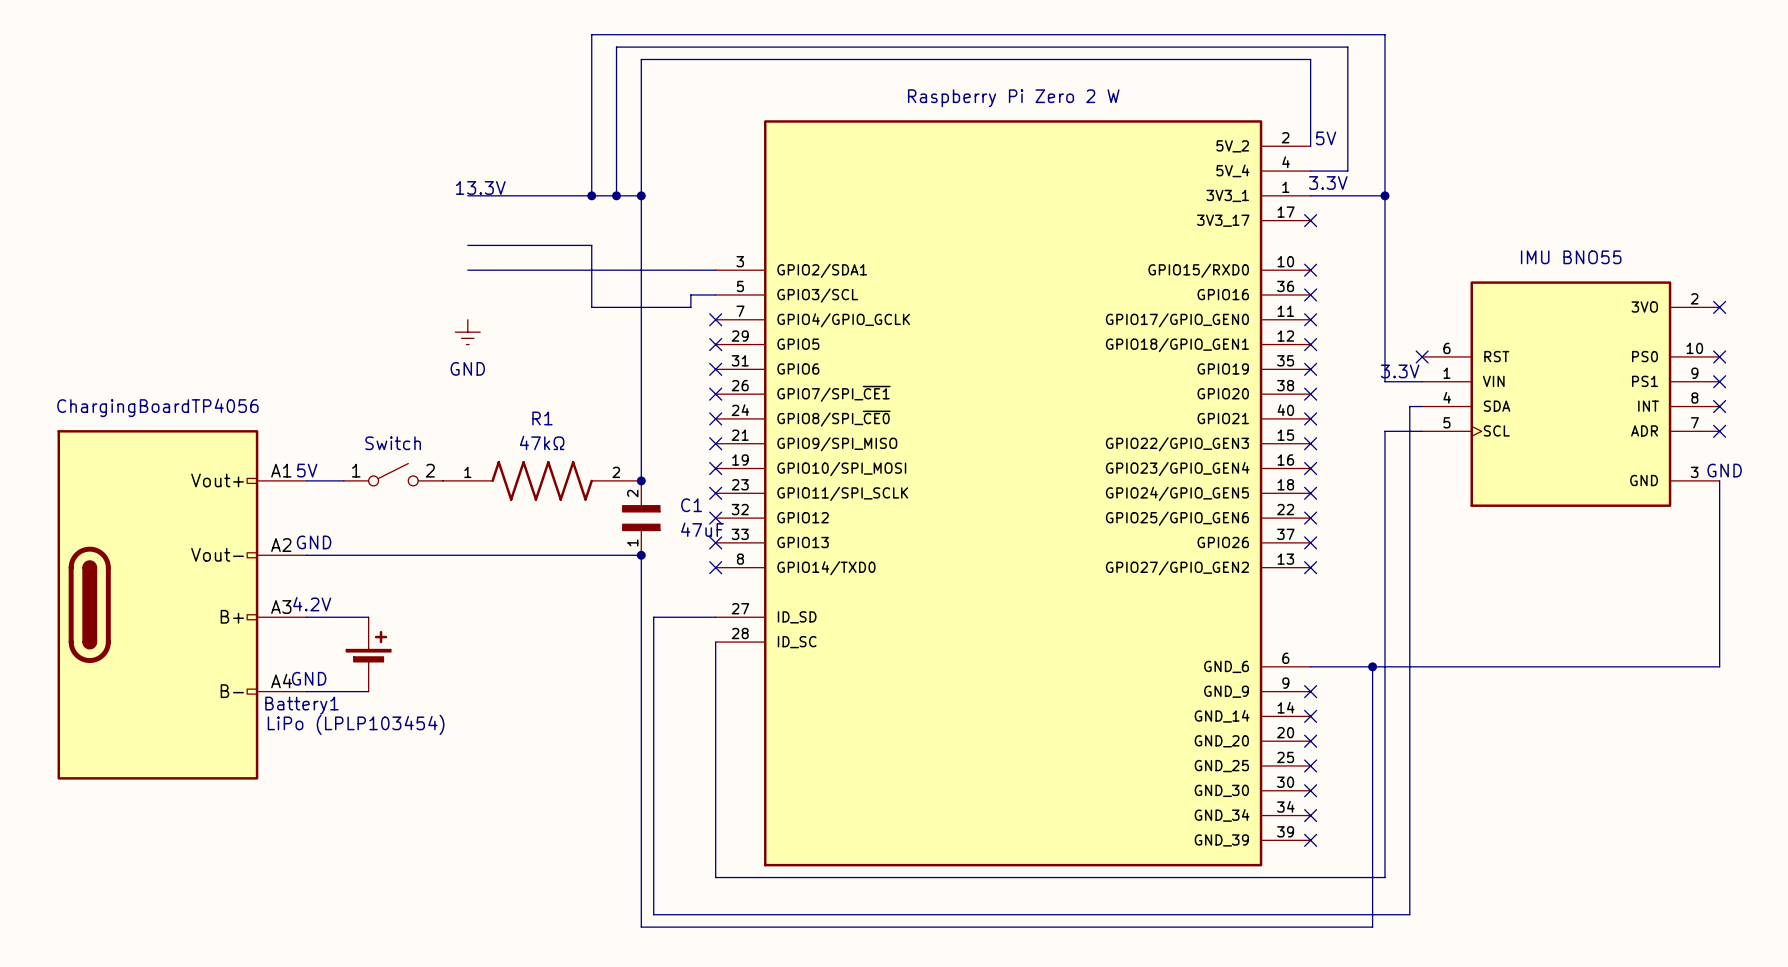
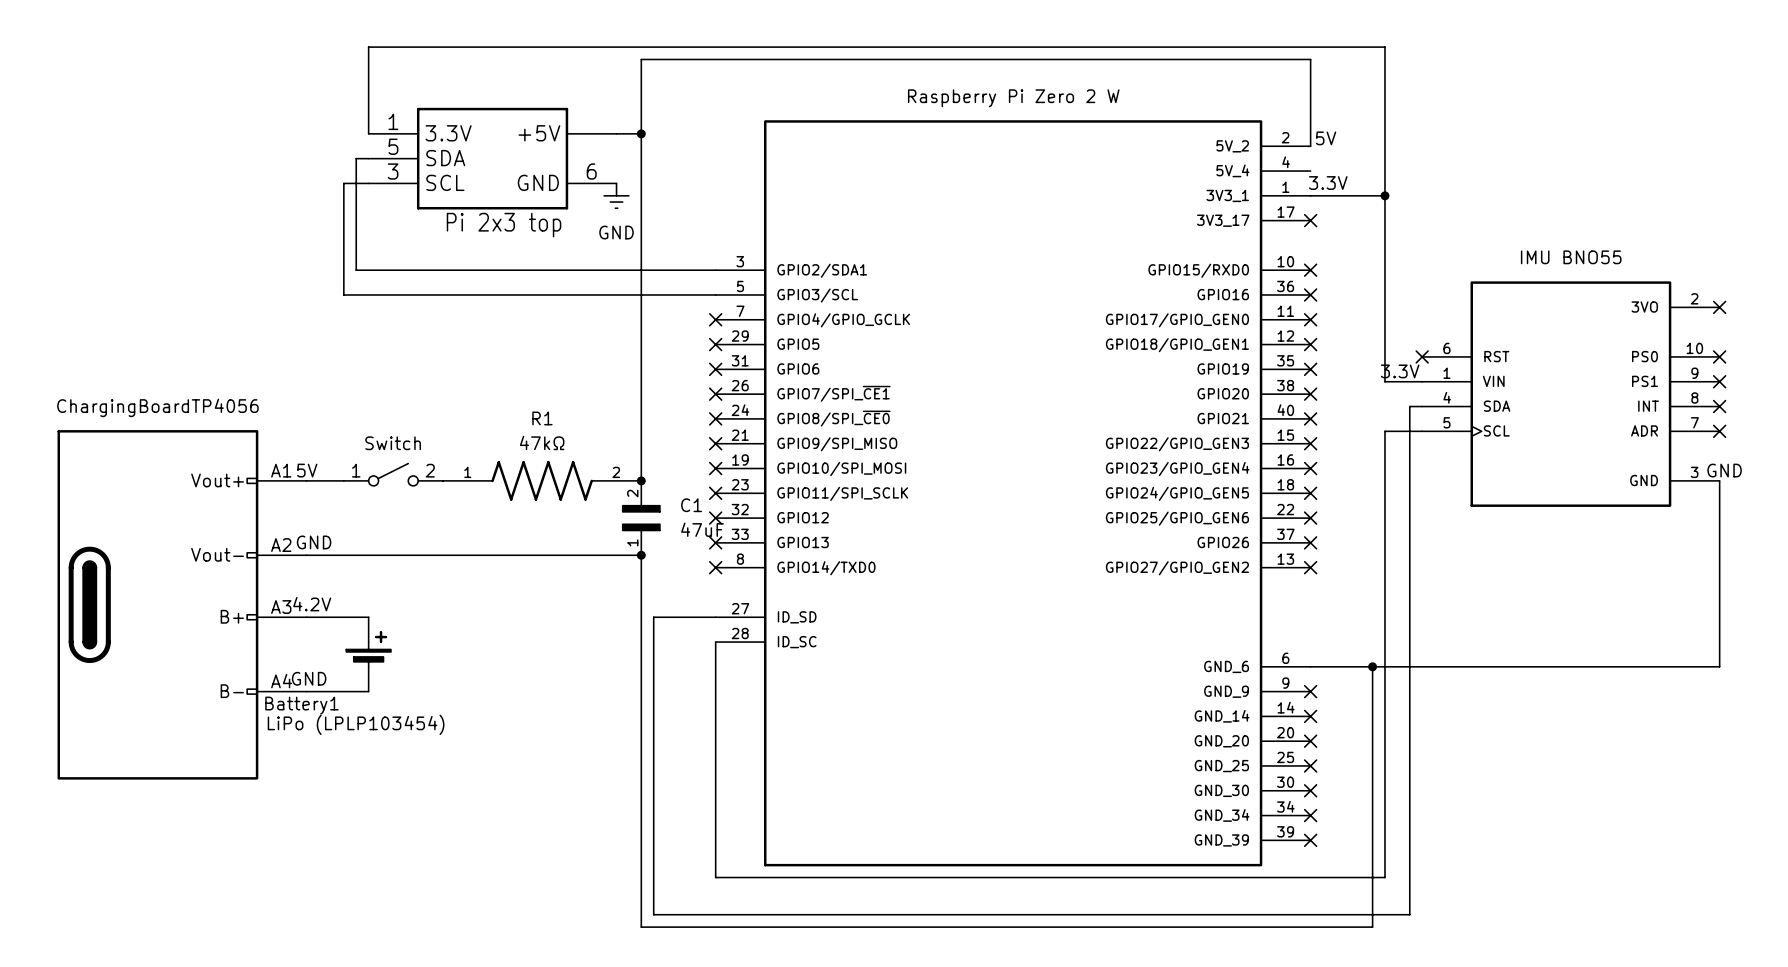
wire: (616, 47) (616, 195) -> (616, 47) (368, 47) (368, 133)
wire: (1347, 47) (1347, 171) (1310, 171) -> (1347, 47) (1384, 47)
wire: (1384, 47) (1384, 34) (591, 34) (591, 195) -> none
wire: none -> (616, 133) (641, 133)
junction: none -> (641, 133)
wire: none -> (368, 158) (356, 158) (356, 270) (467, 270)
part: none -> (492, 158)
text: 13.3V (480, 187) -> none
wire: (467, 195) (641, 195) -> none
junction: (591, 195) -> none
junction: (616, 195) -> none
junction: (641, 195) -> none
wire: (467, 245) (591, 245) (591, 307) (690, 307) (690, 294) -> (368, 183) (343, 183) (343, 294) (690, 294)
power symbol position: GND (467, 332) -> GND (616, 195)

